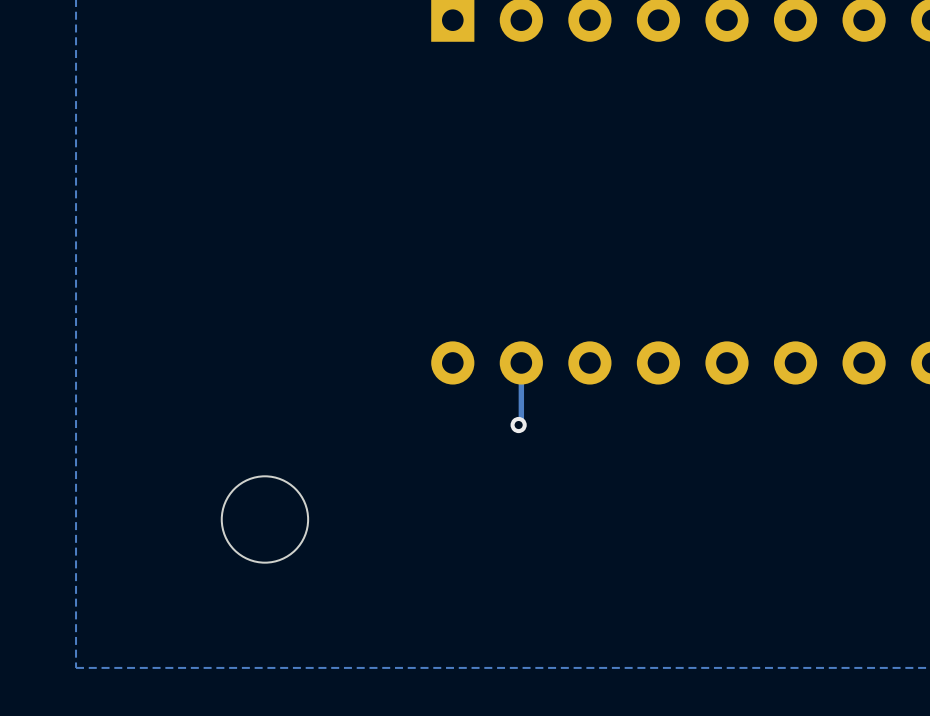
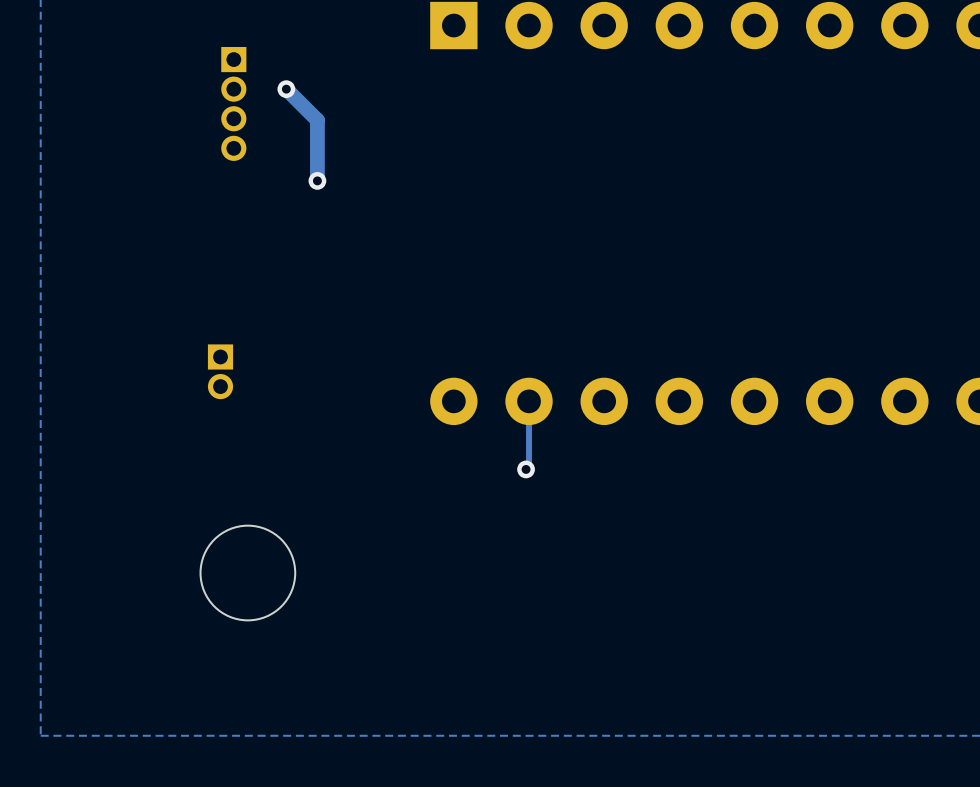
track: none -> (286, 89) (317, 120) (317, 180)
via: none -> (286, 89)
part: none -> (233, 103)
via: none -> (317, 180)
part: none -> (220, 371)

